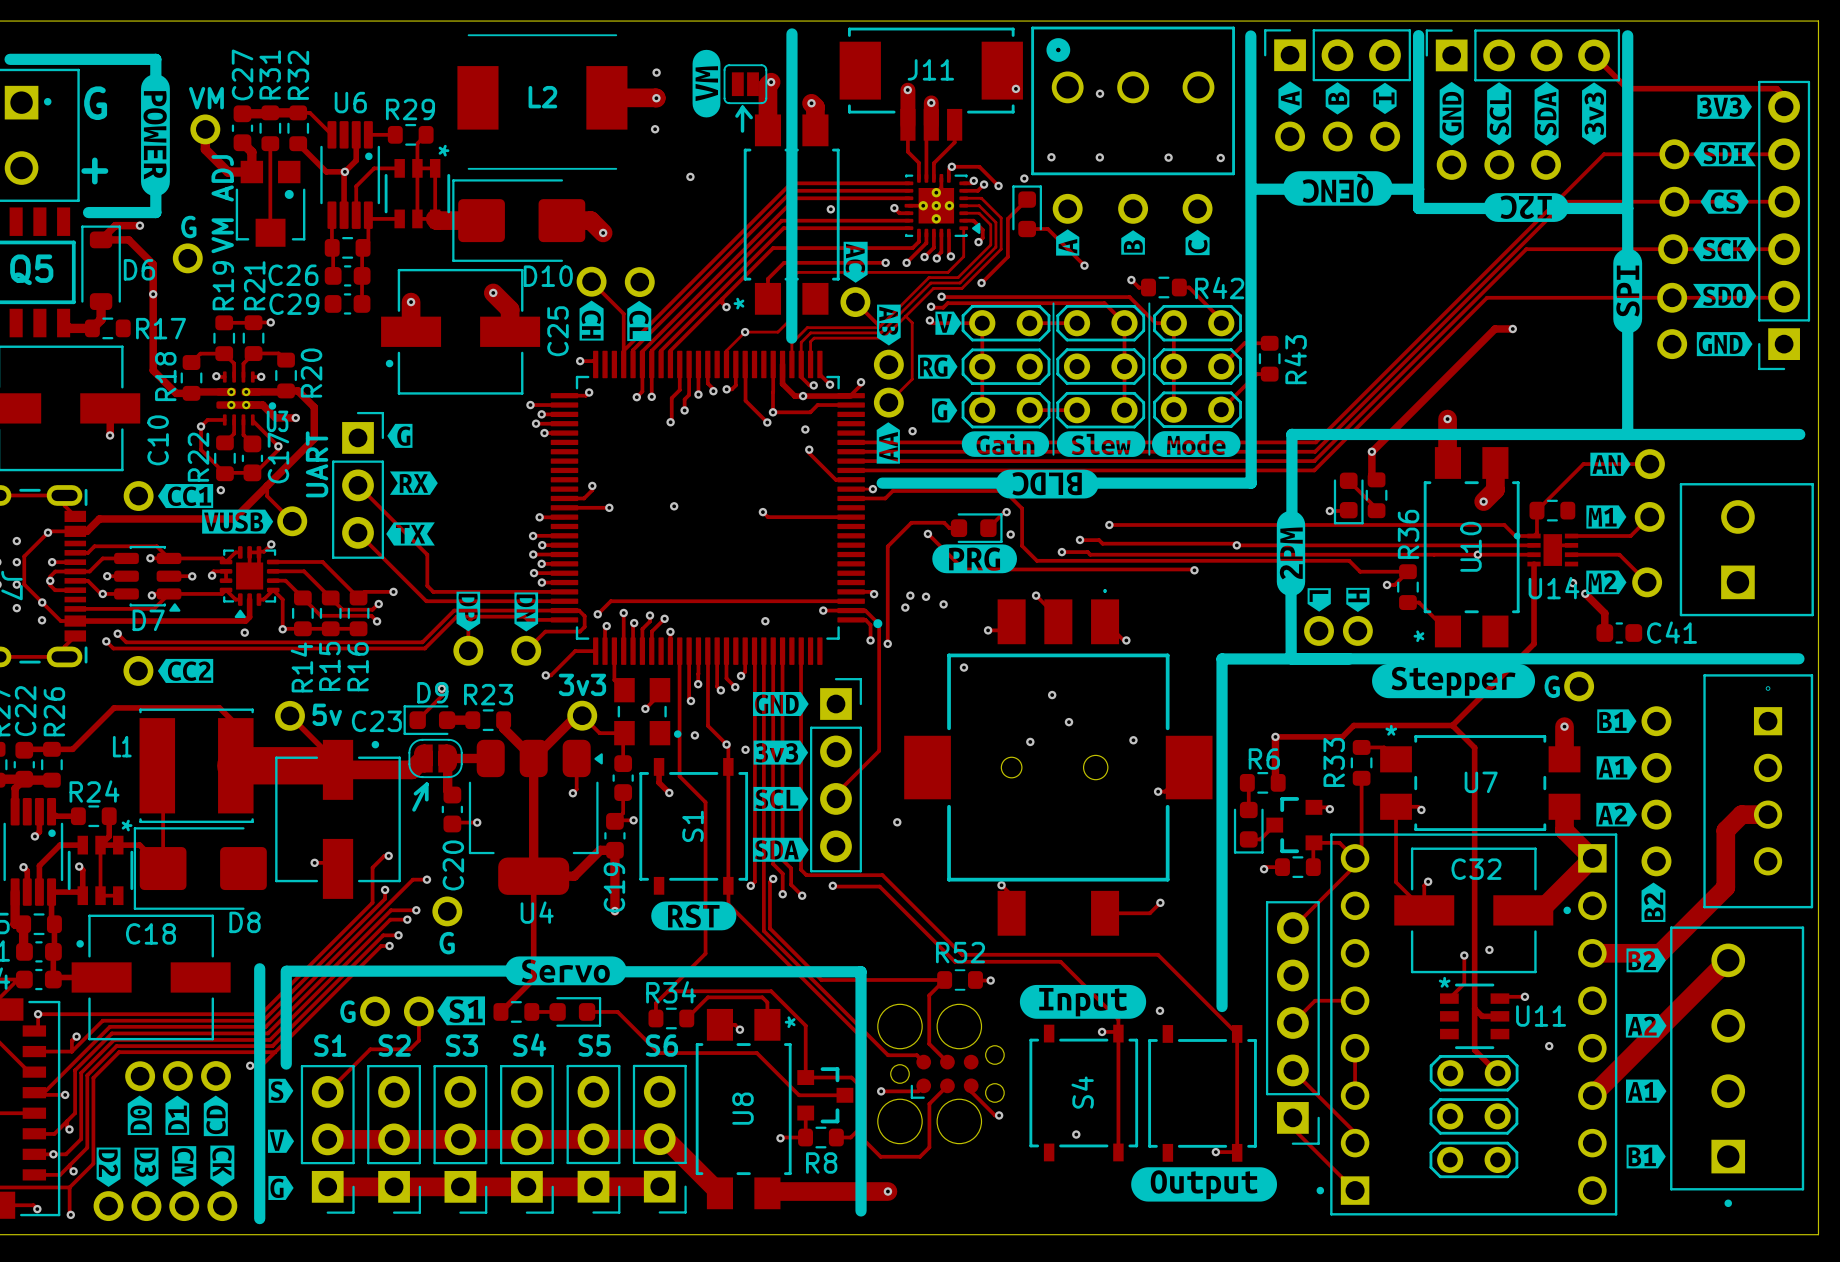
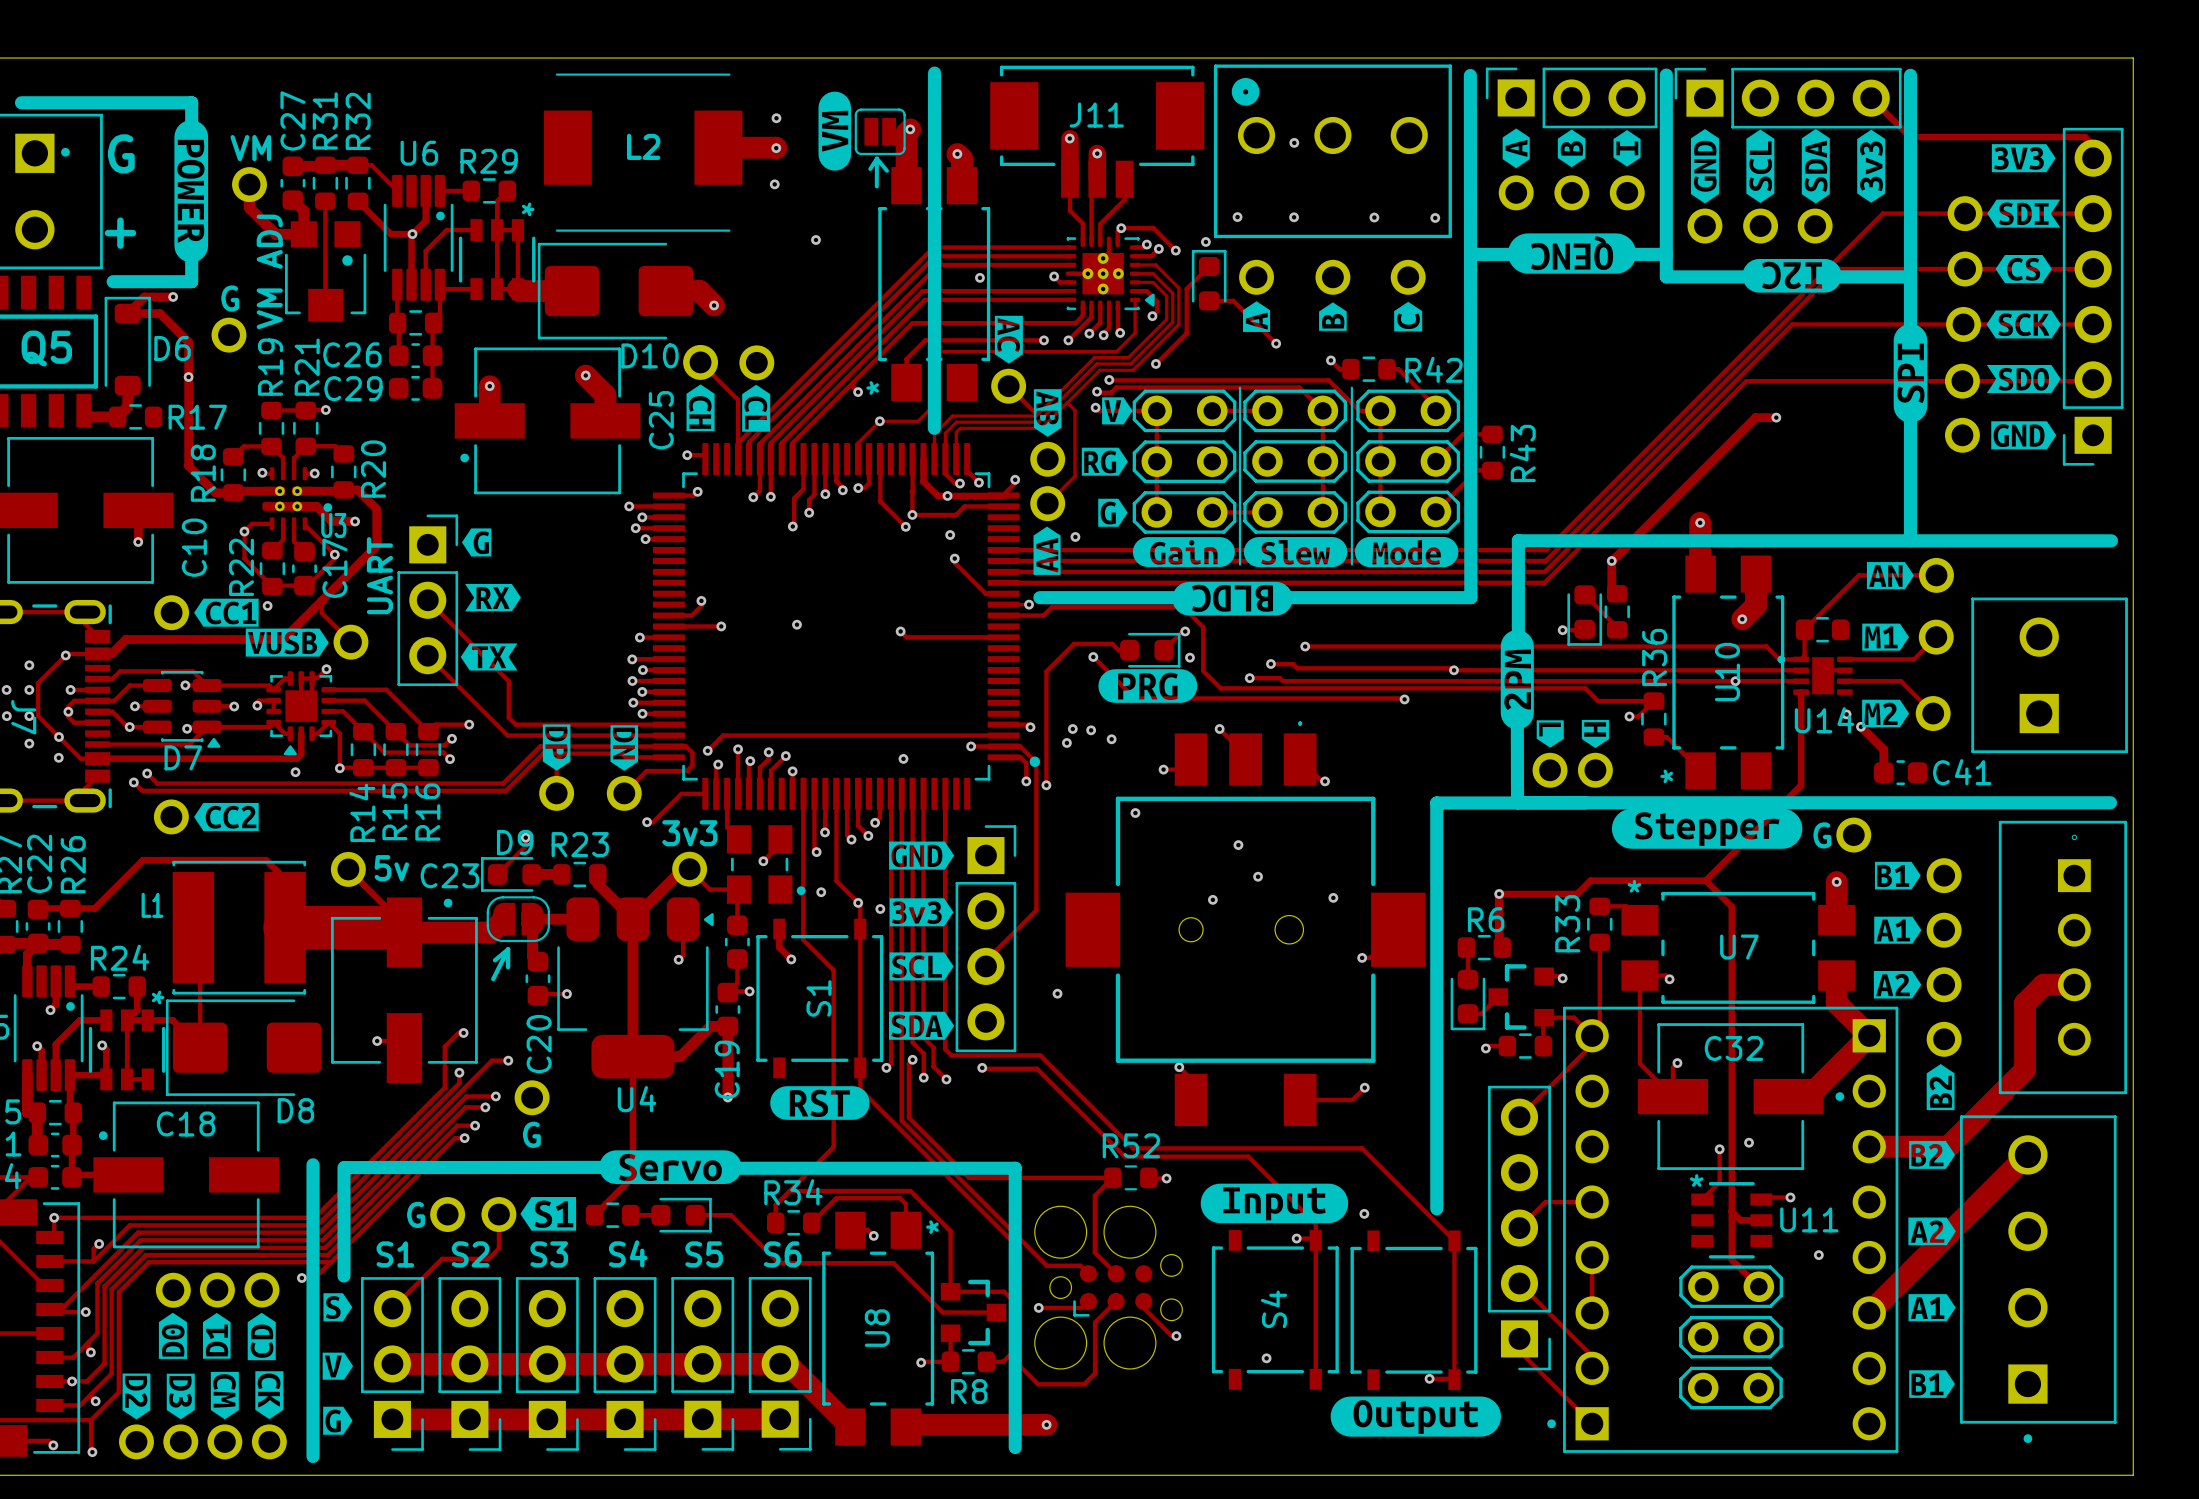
via: (1015, 88) -> none

